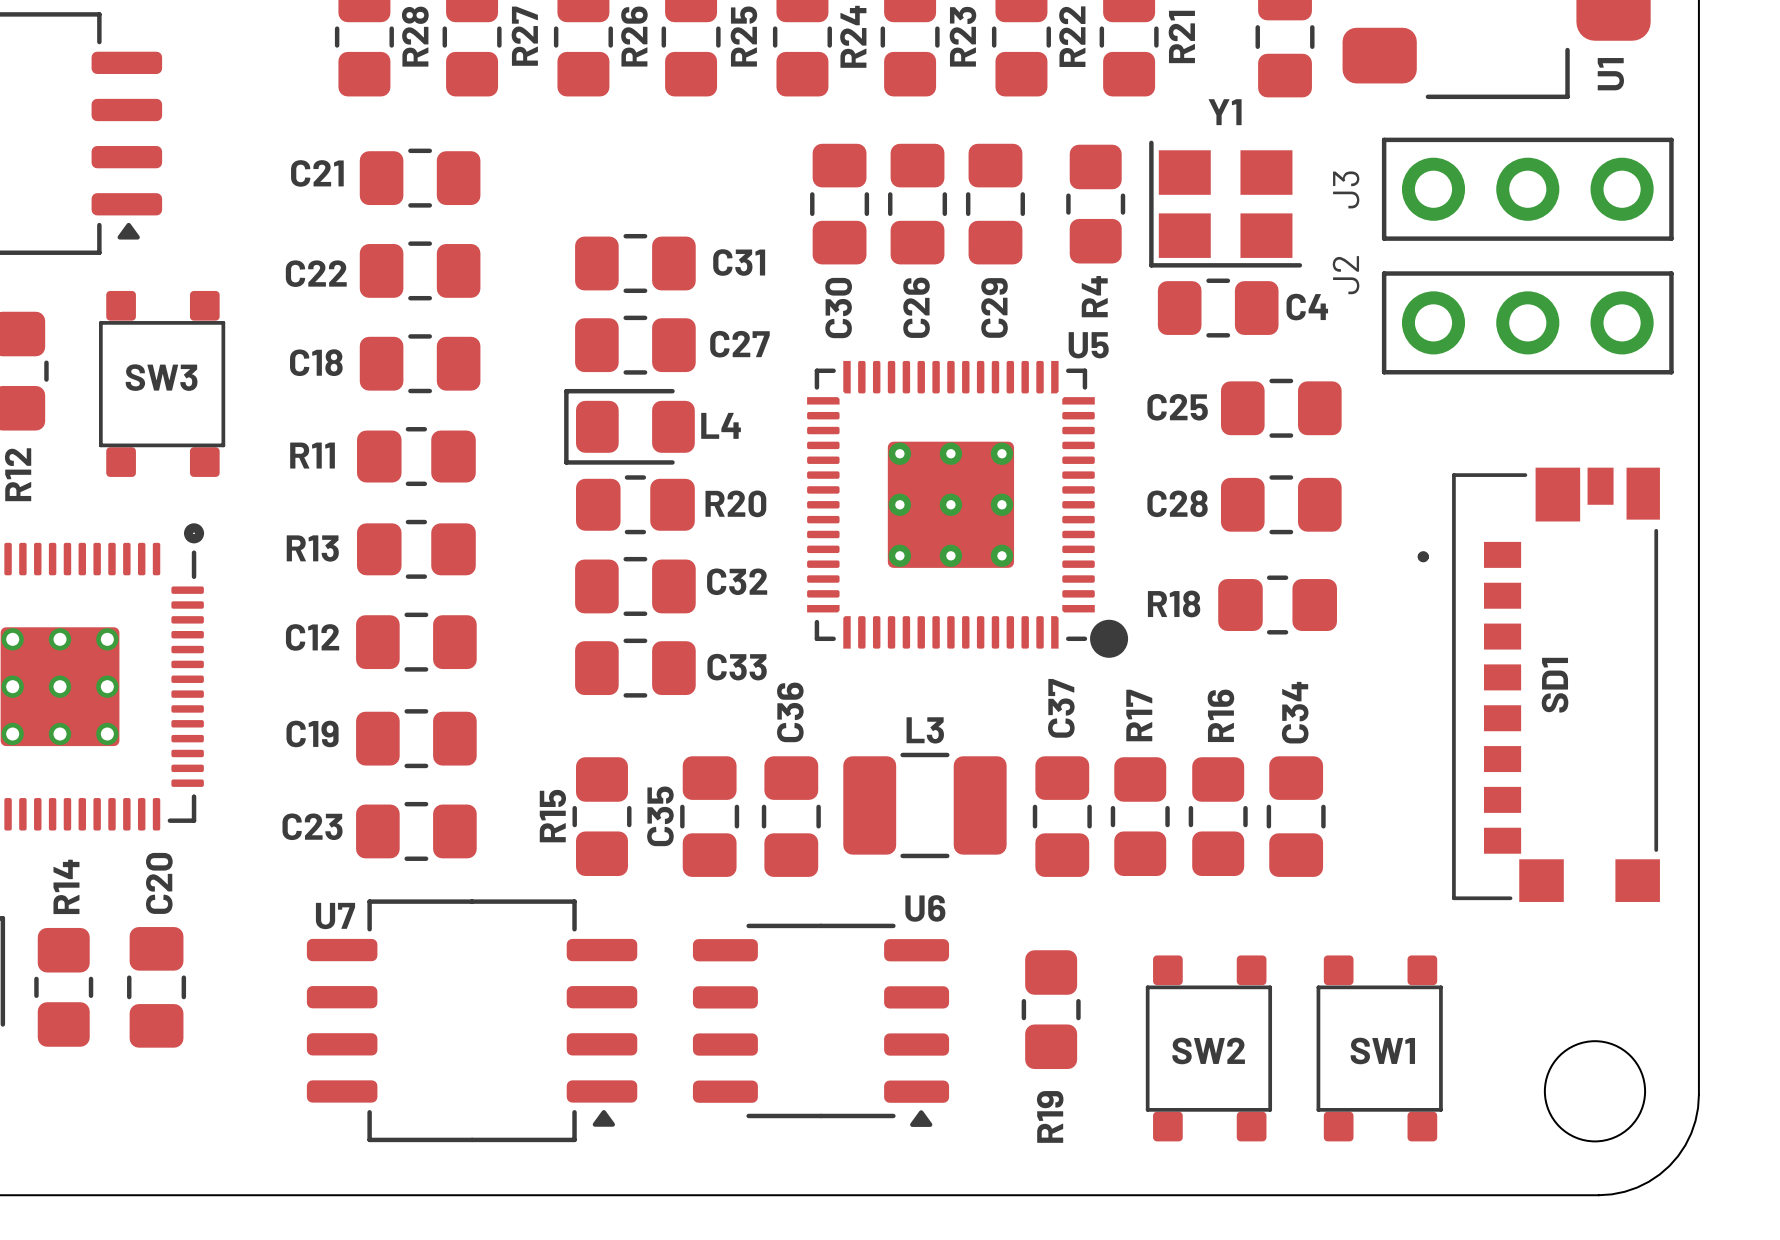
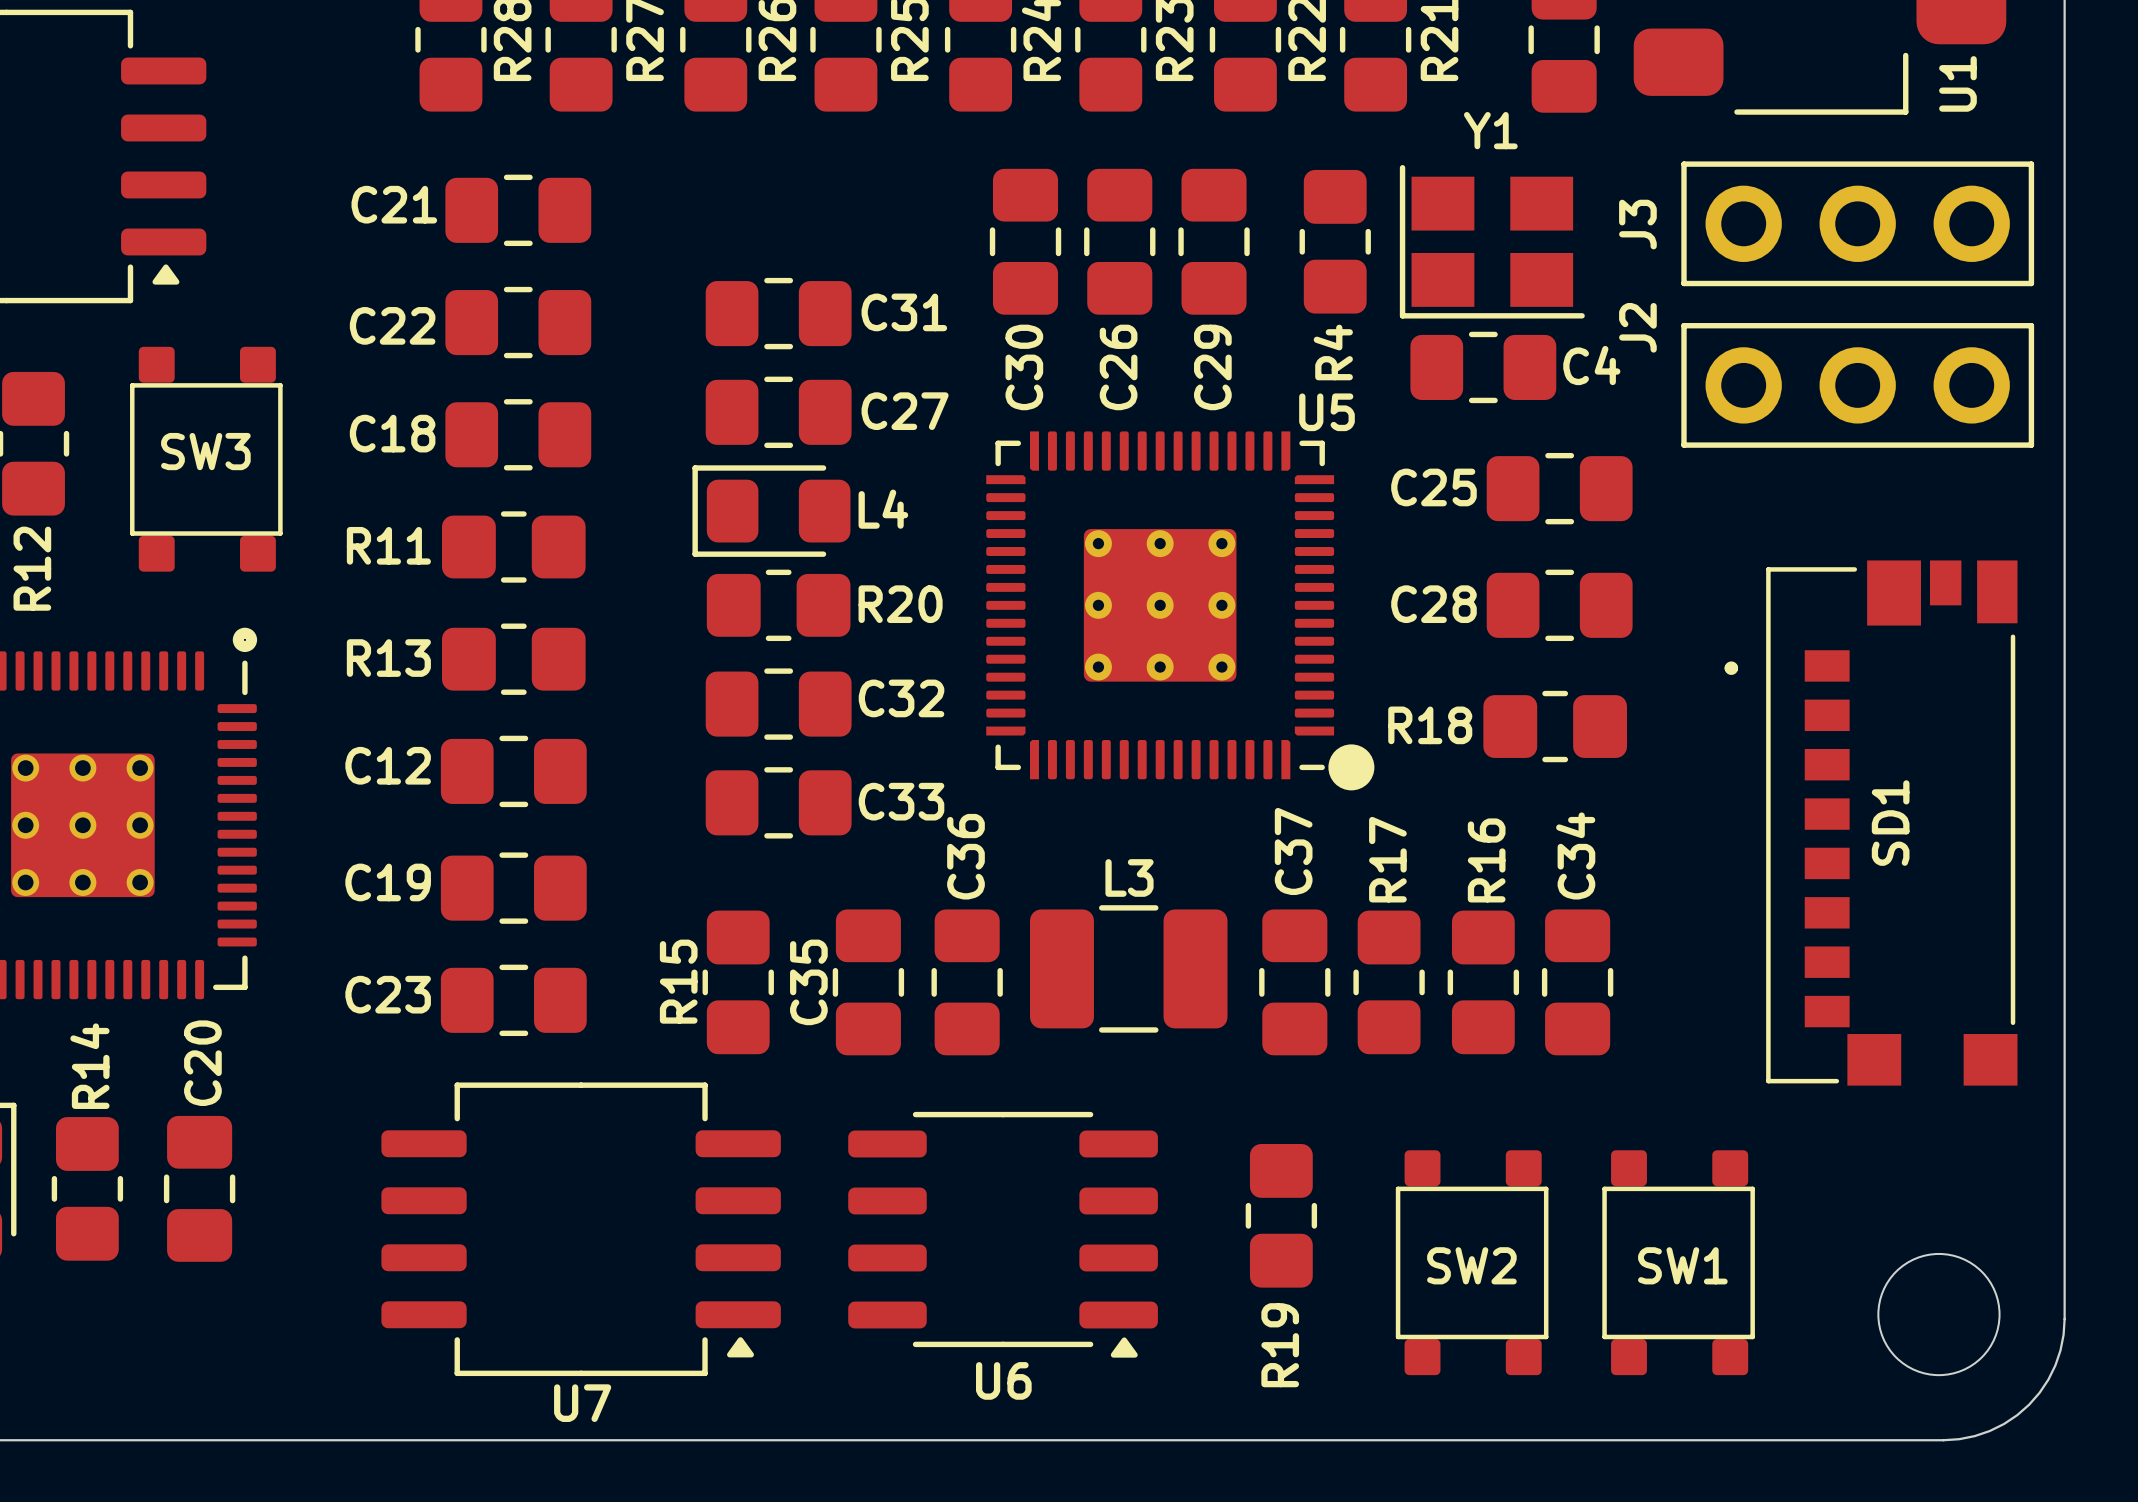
U6 name position: U6 (925, 908) -> U6 (1003, 1380)
U7 name position: U7 (335, 916) -> U7 (582, 1403)

